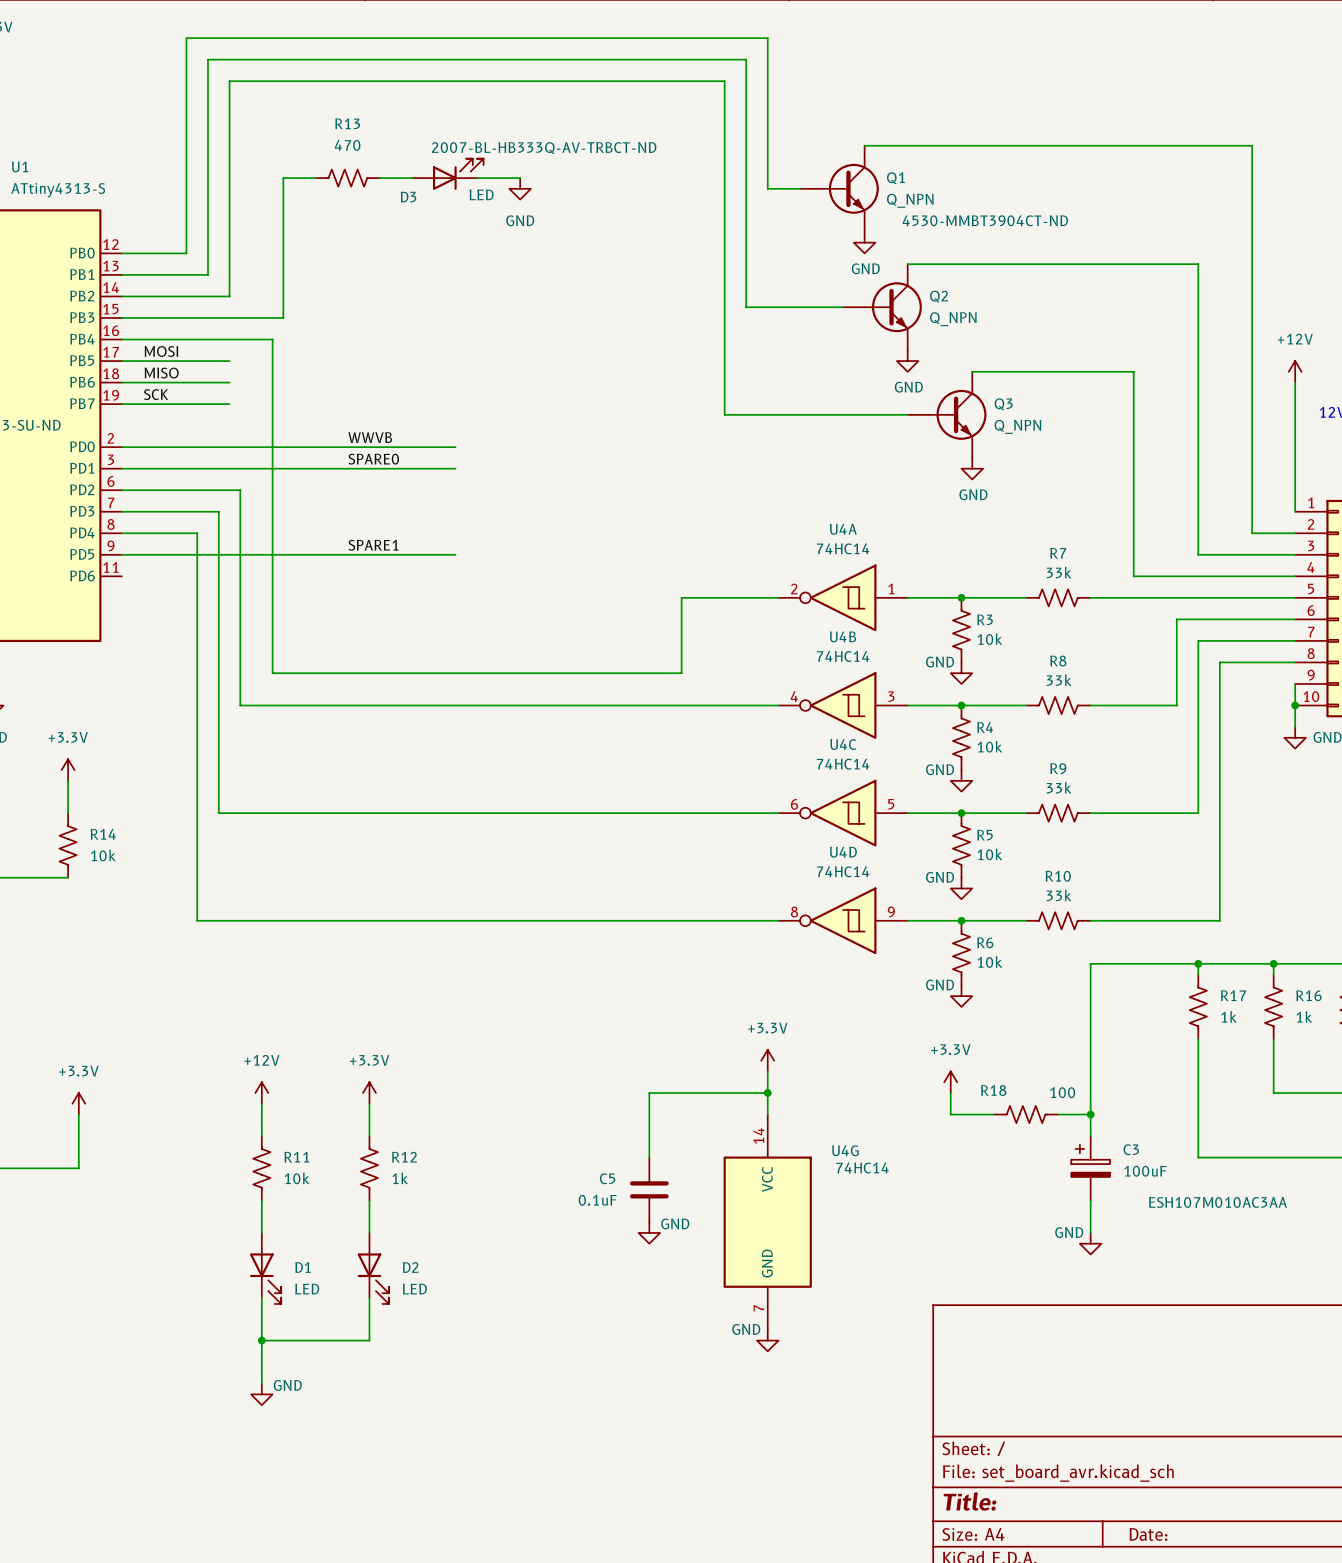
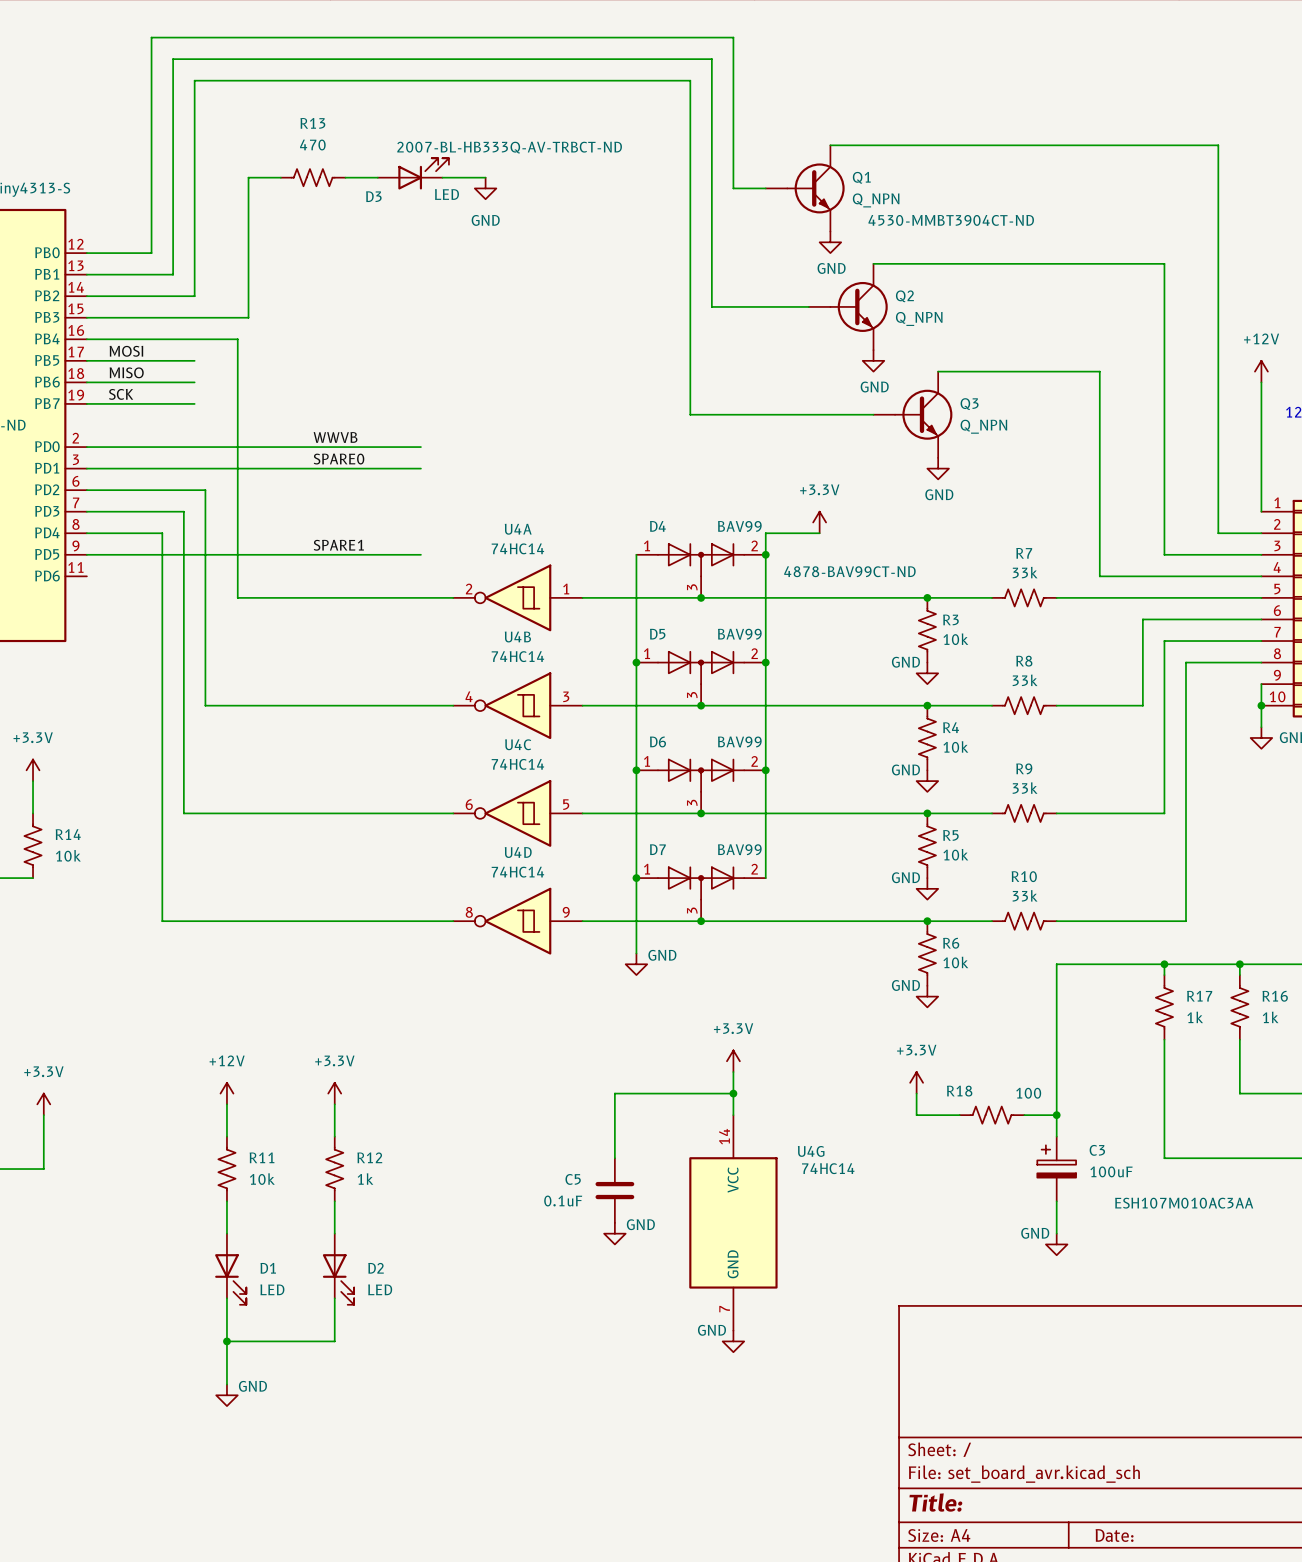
power symbol: none -> +3.3V (819, 522)
wire: none -> (819, 533) (765, 533) (765, 878)
wire: none -> (636, 554) (636, 953)
junction: none -> (765, 554)
D4: none -> BAV99 (701, 570)
wire: (272, 597) (272, 673) (681, 673) (681, 597) -> (237, 597) (453, 597)
wire: none -> (582, 597) (647, 597)
junction: none -> (701, 597)
U4A position: (843, 597) -> (517, 597)
junction: none -> (636, 662)
junction: none -> (765, 662)
D5: none -> BAV99 (701, 678)
junction: none -> (701, 705)
U4B position: (843, 705) -> (517, 705)
junction: none -> (636, 770)
junction: none -> (765, 770)
D6: none -> BAV99 (701, 786)
junction: none -> (701, 813)
U4C position: (843, 813) -> (517, 813)
junction: none -> (636, 878)
D7: none -> BAV99 (701, 893)
junction: none -> (701, 921)
U4D position: (843, 920) -> (517, 921)
power symbol: none -> GND (636, 964)

